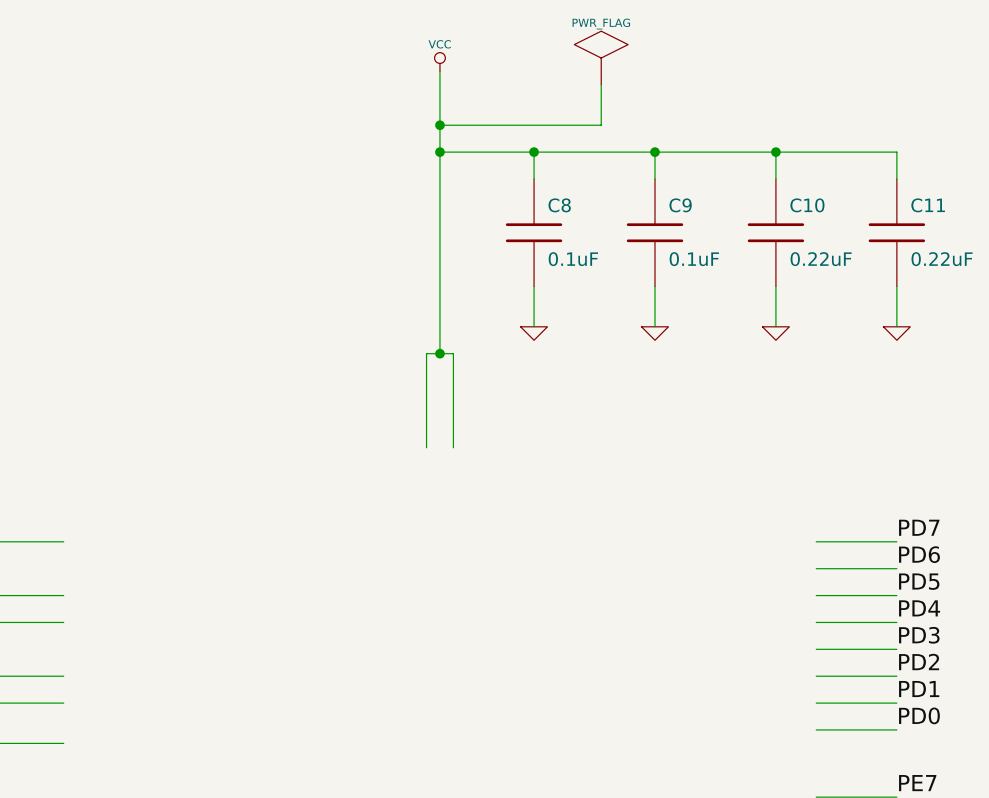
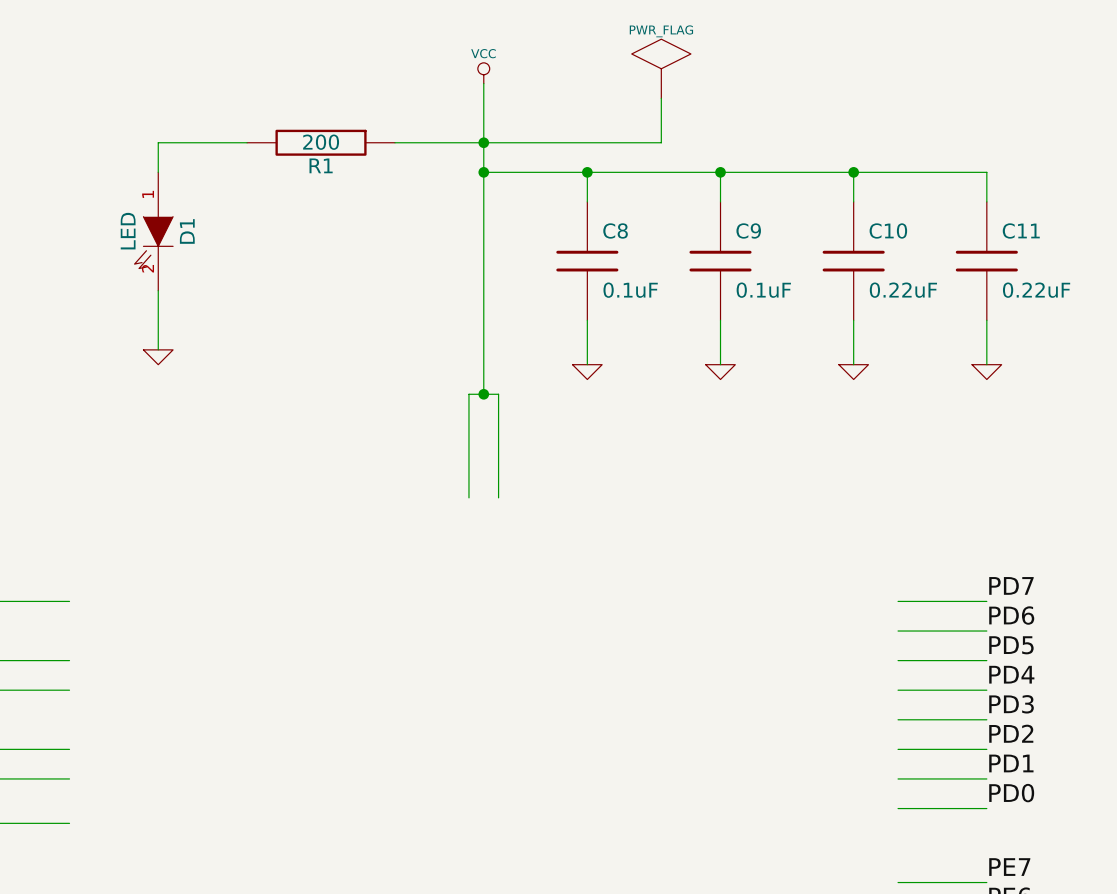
wire: none -> (247, 142) (158, 142) (158, 172)
R1: none -> 200 (321, 142)
wire: none -> (395, 142) (483, 142)
D1: none -> LED (153, 231)
wire: none -> (158, 290) (158, 349)
power symbol: none -> (158, 357)

